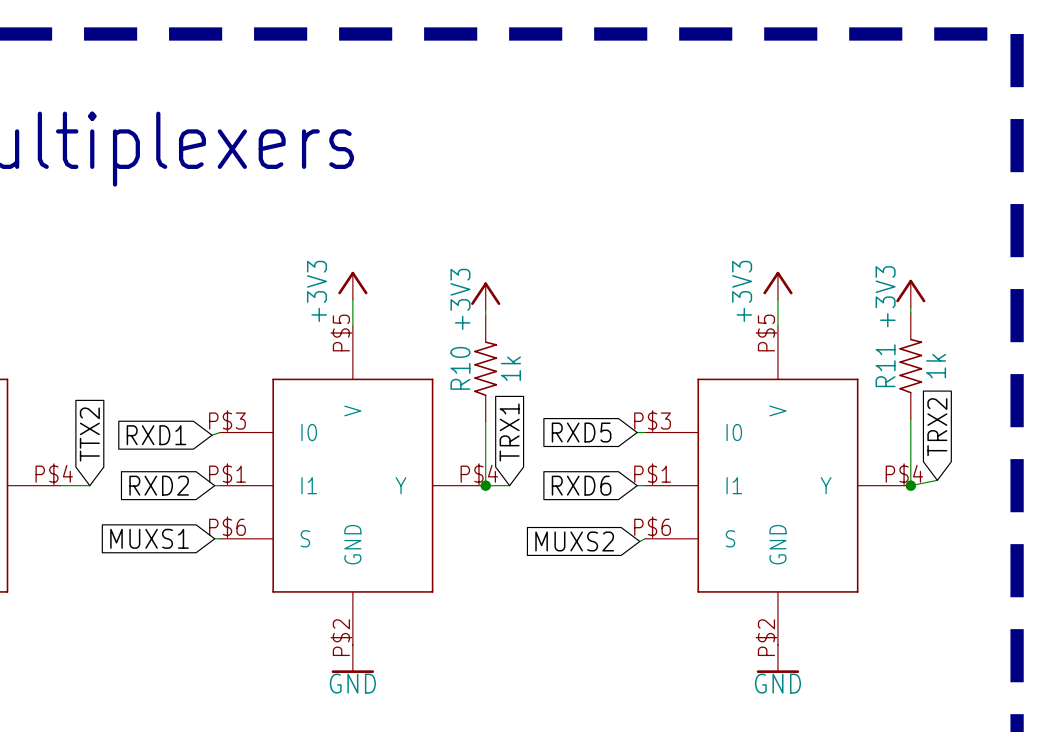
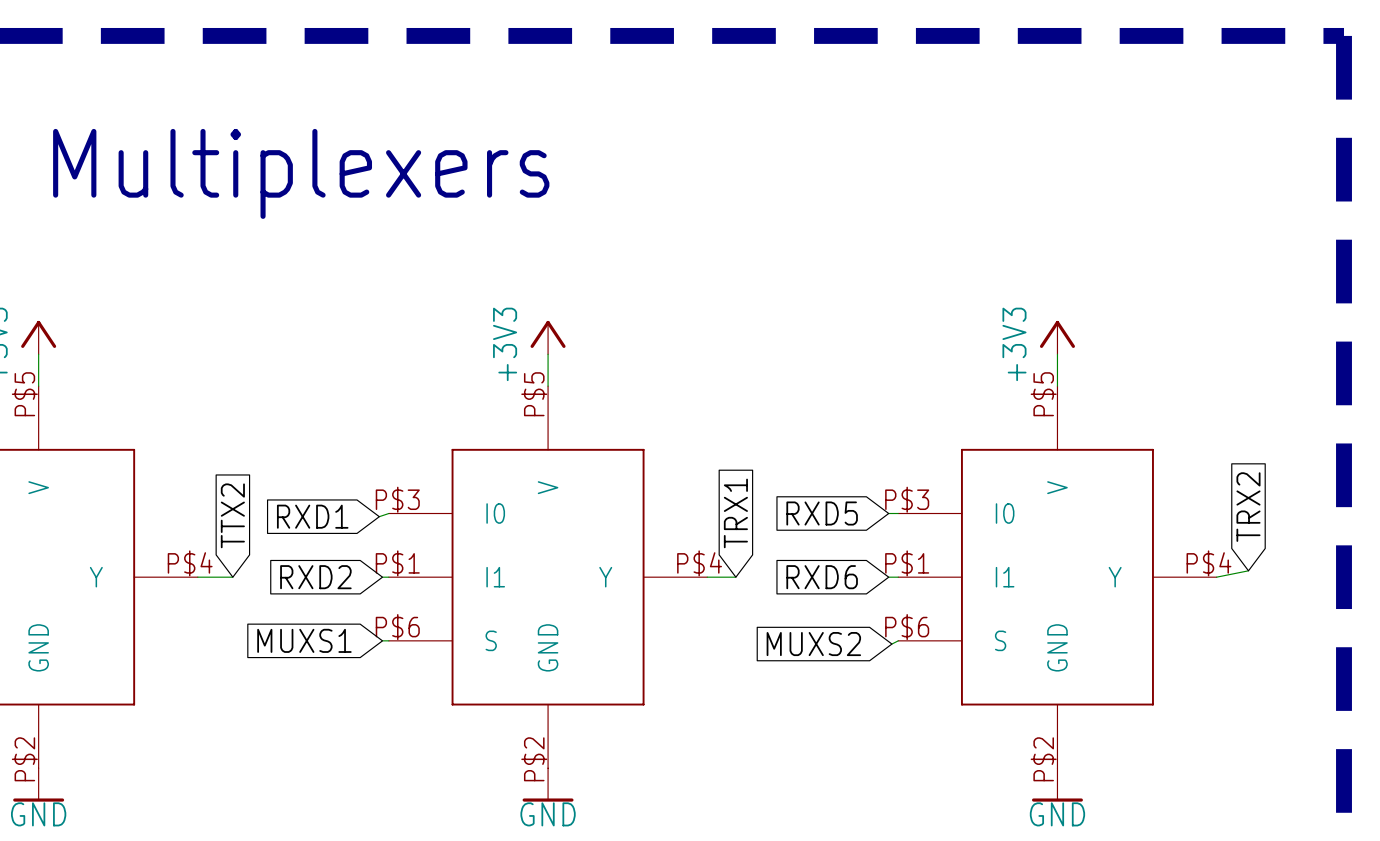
power symbol: +3V3 (910, 293) -> none
power symbol: +3V3 (485, 296) -> none
wire: (910, 307) (910, 312) -> none
wire: (485, 310) (485, 315) -> none
R11: 1k (910, 366) -> none
R10: 1k (485, 368) -> none
wire: (910, 419) (910, 485) -> none
wire: (485, 421) (485, 485) -> none
junction: (485, 485) -> none
junction: (910, 485) -> none

